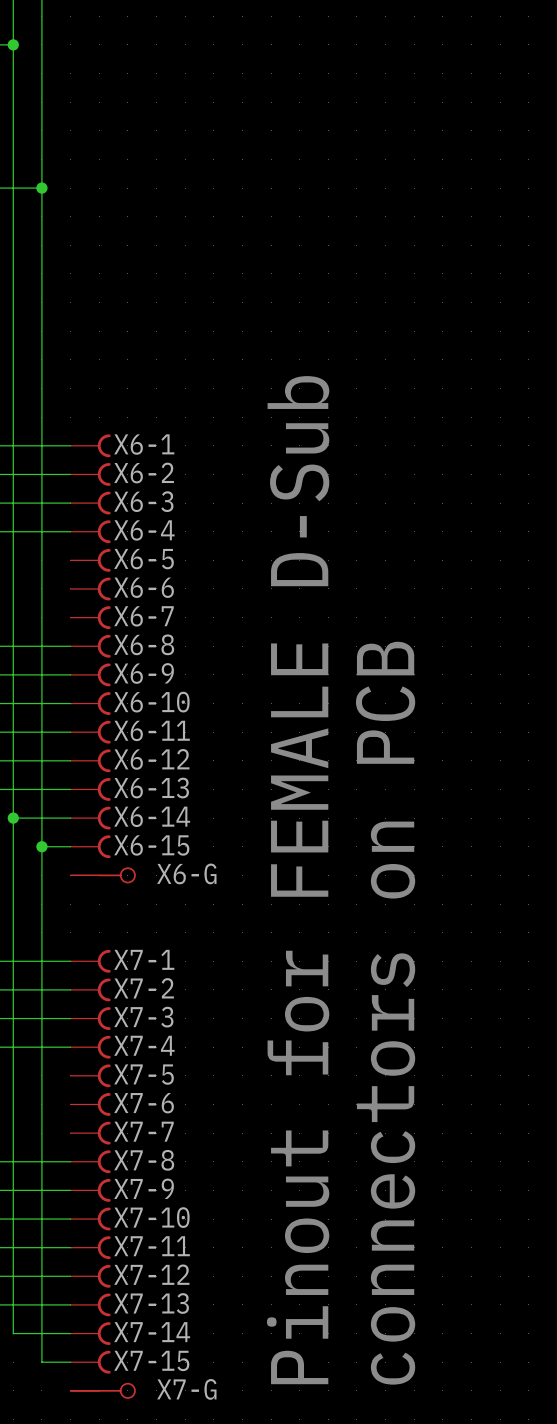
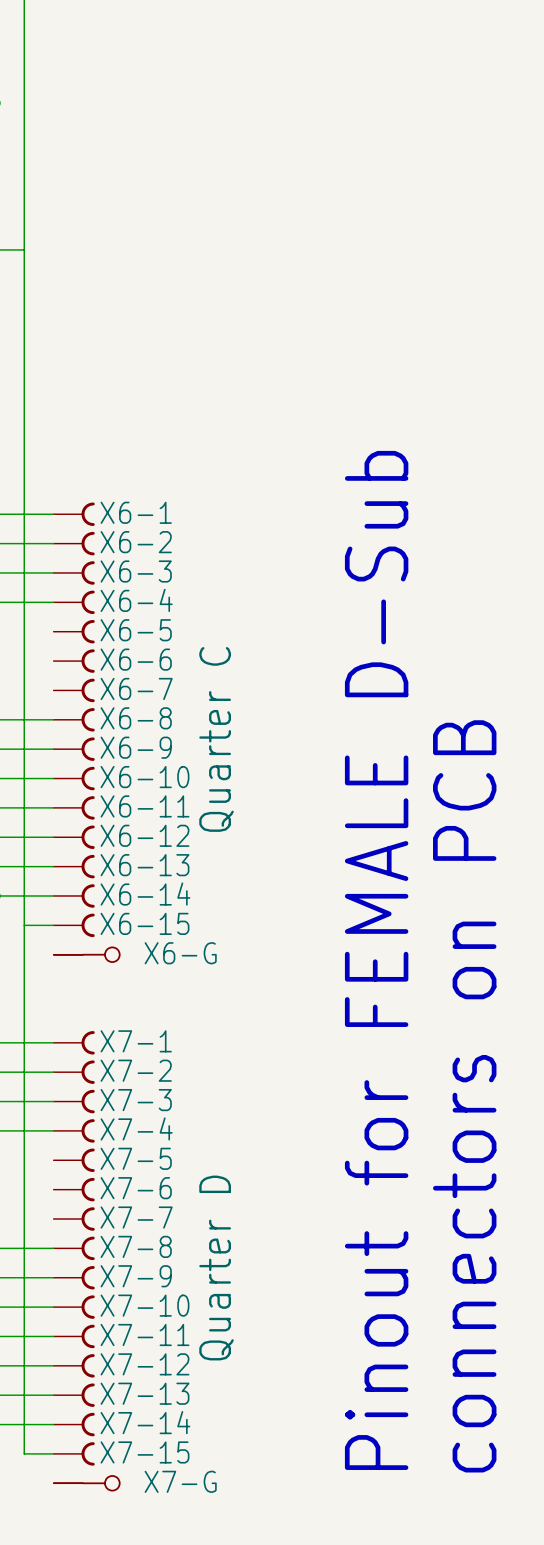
junction: (41, 188) -> none
text: none -> Quarter C (216, 739)
junction: (41, 846) -> none
text: Pinout for FEMALE D-Sub (298, 880) -> none
text: connectors on PCB (385, 1013) -> Pinout for FEMALE D-Sub (376, 960)
text: none -> connectors on PCB (464, 1096)
text: none -> Quarter D (216, 1268)

